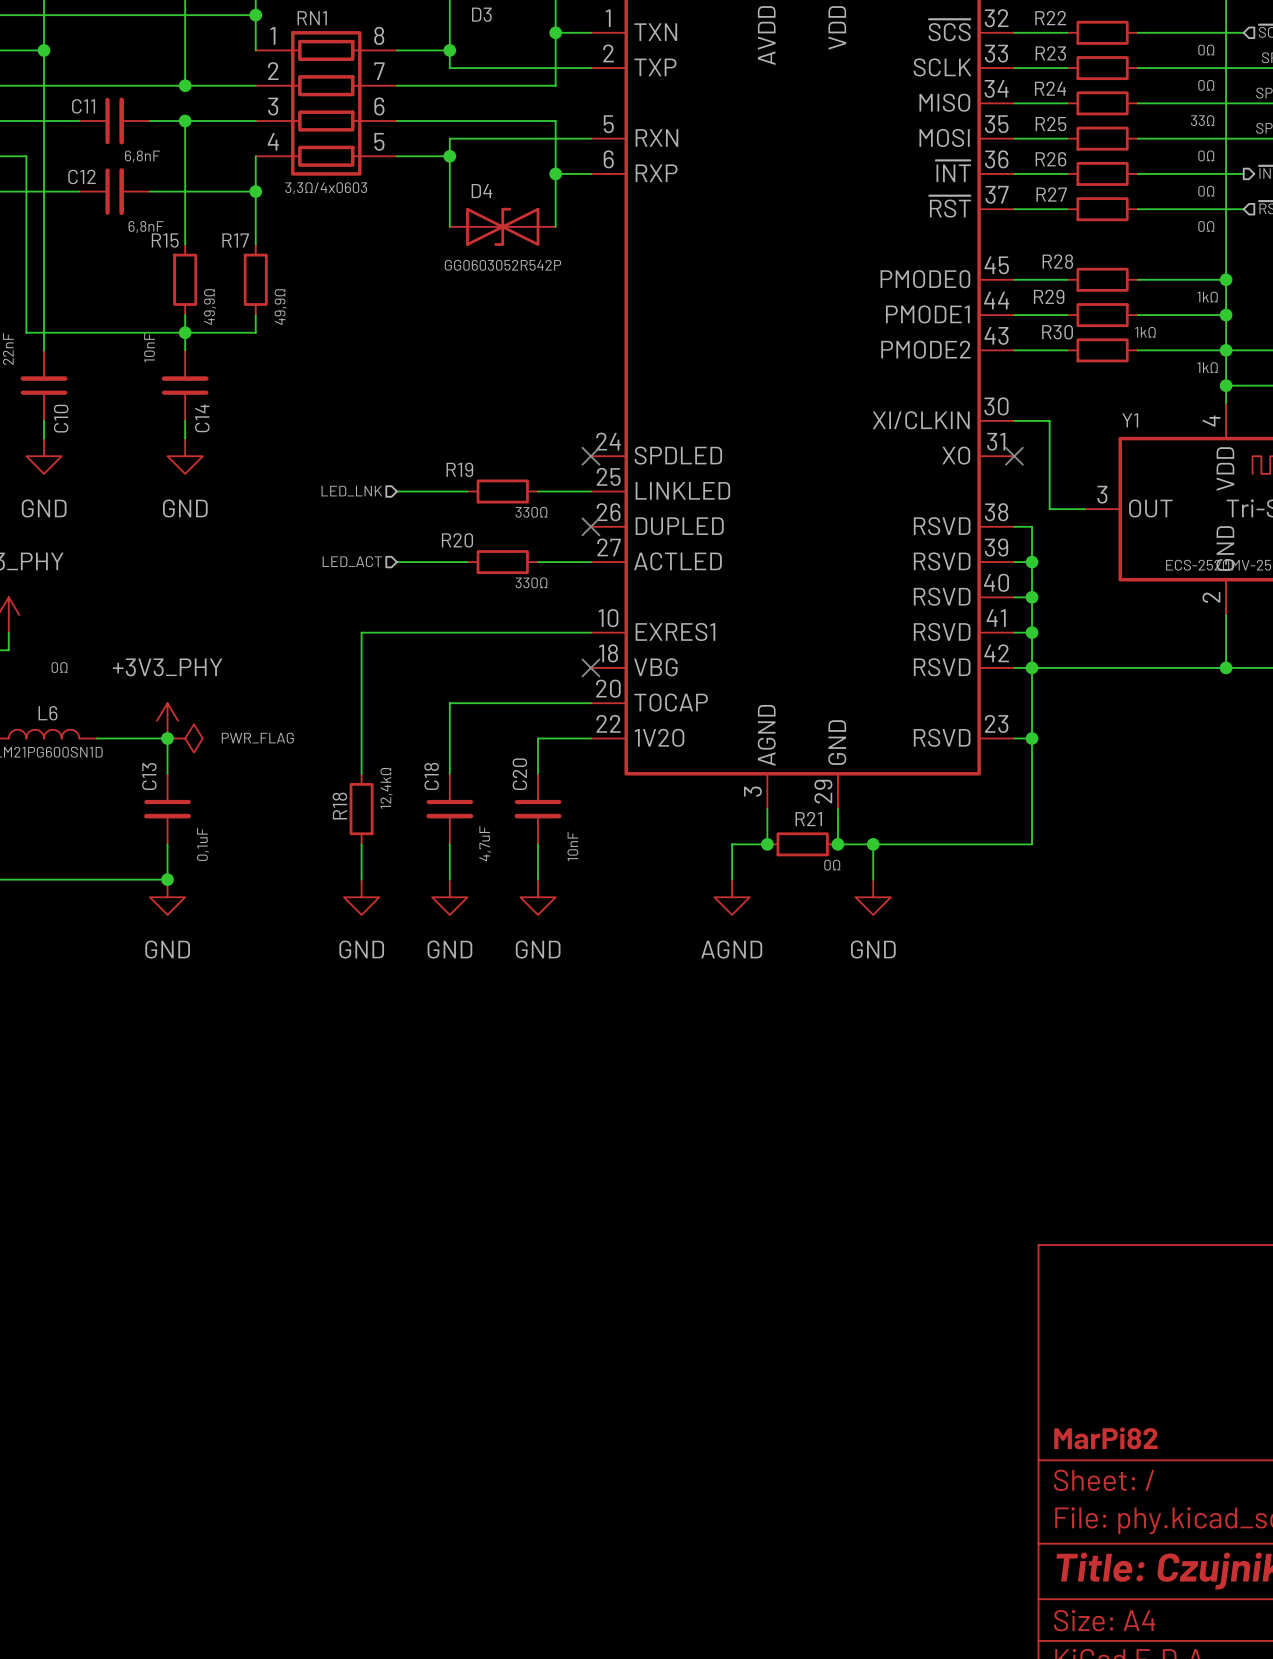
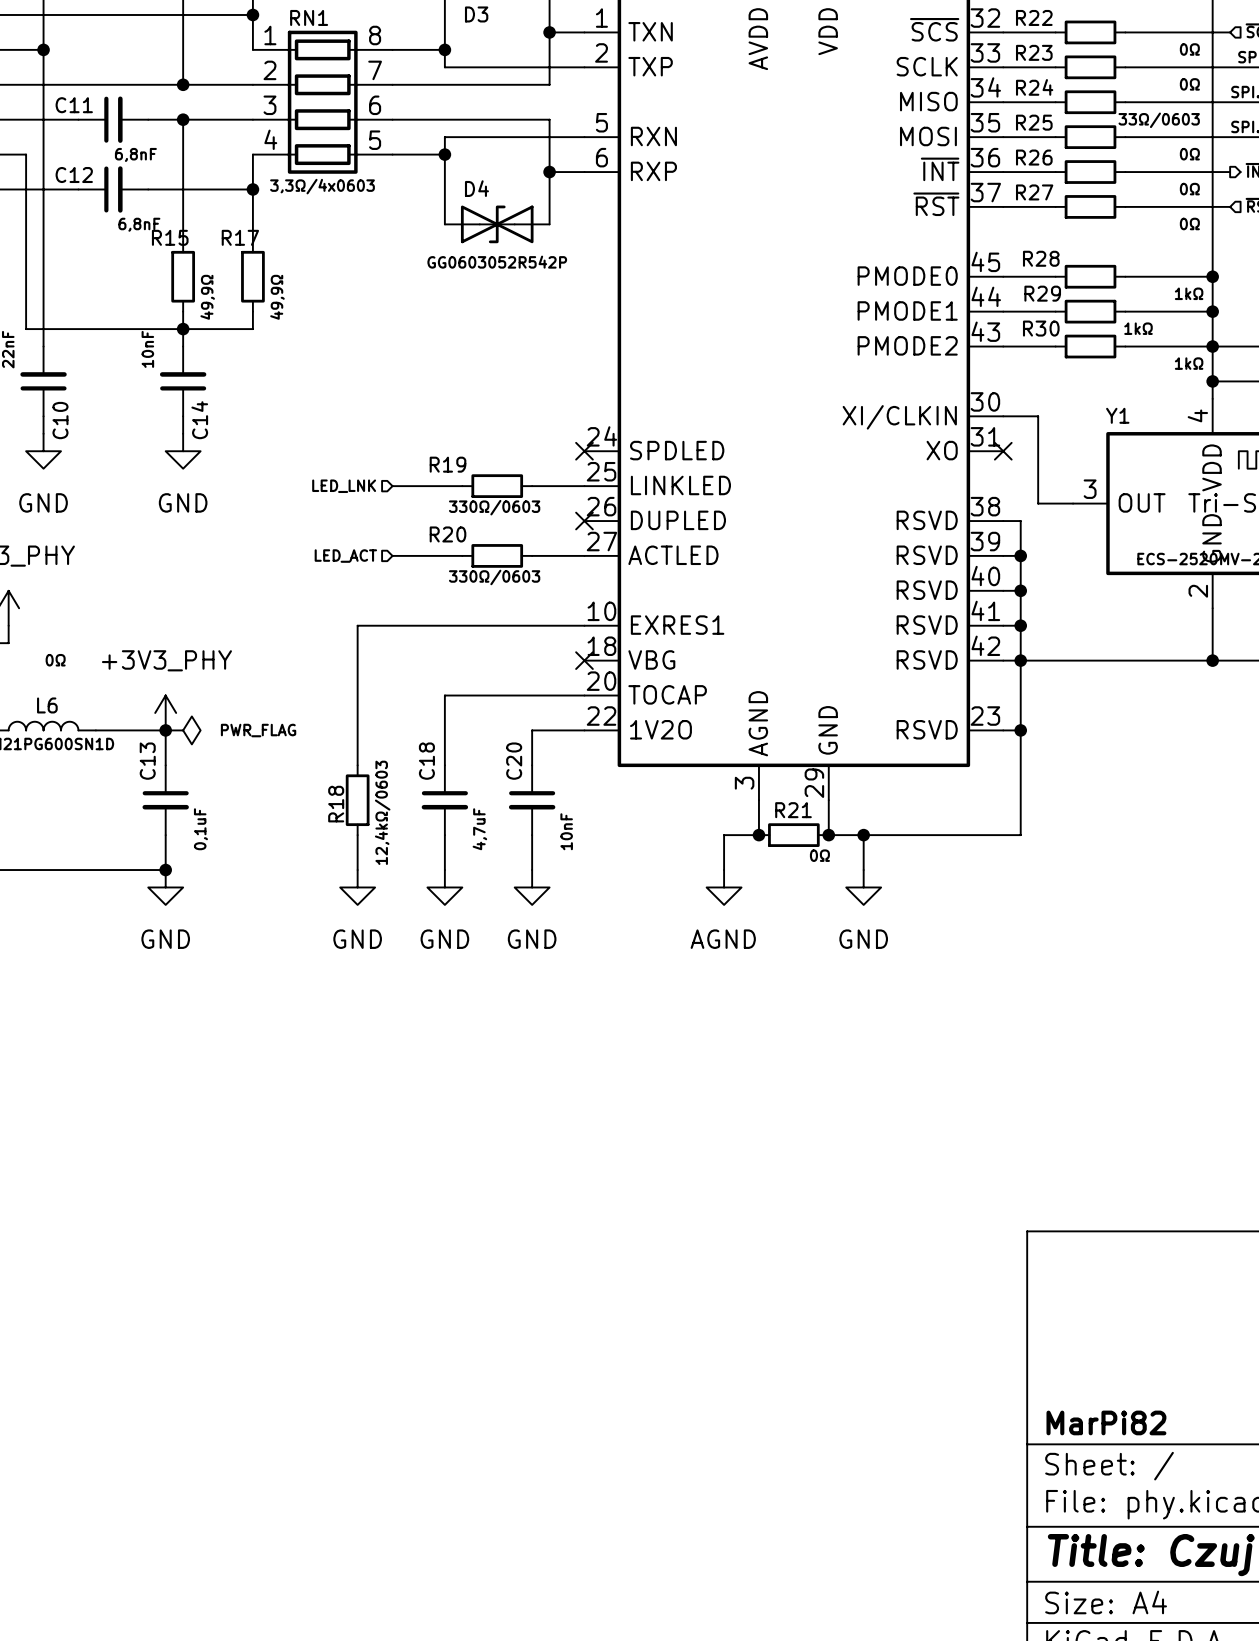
R24 value: 33Ω (1202, 120) -> 33Ω/0603 (1159, 120)
R19 value: 330Ω (531, 512) -> 330Ω/0603 (494, 507)
R20 value: 330Ω (531, 582) -> 330Ω/0603 (494, 577)
R18 value: 12,4kΩ (386, 788) -> 12,4kΩ/0603 (382, 812)

